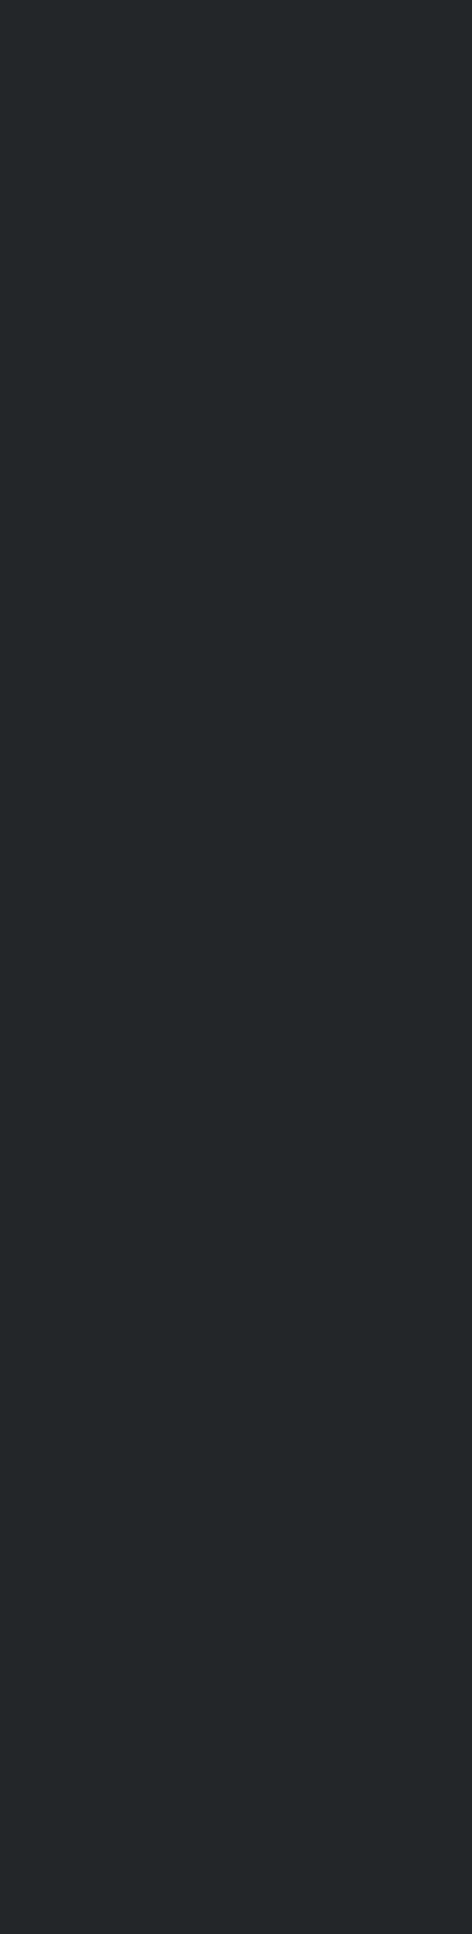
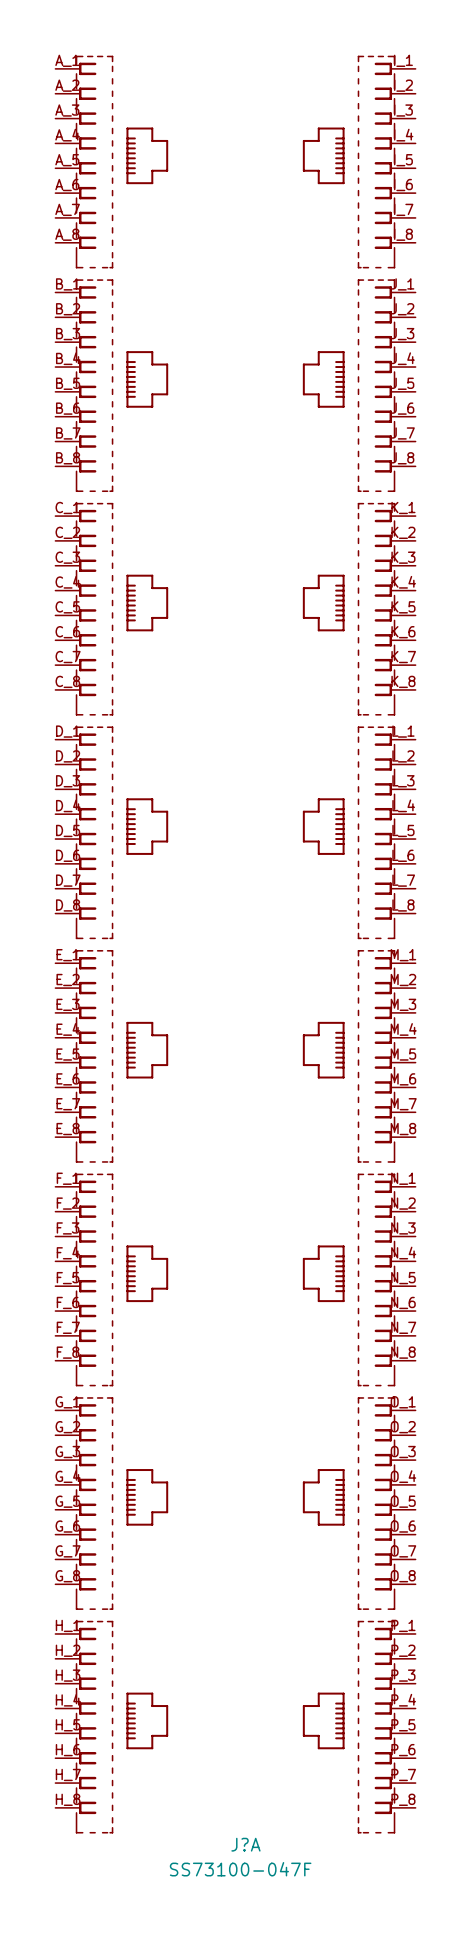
J?A: none -> SS73100-047F (235, 944)

